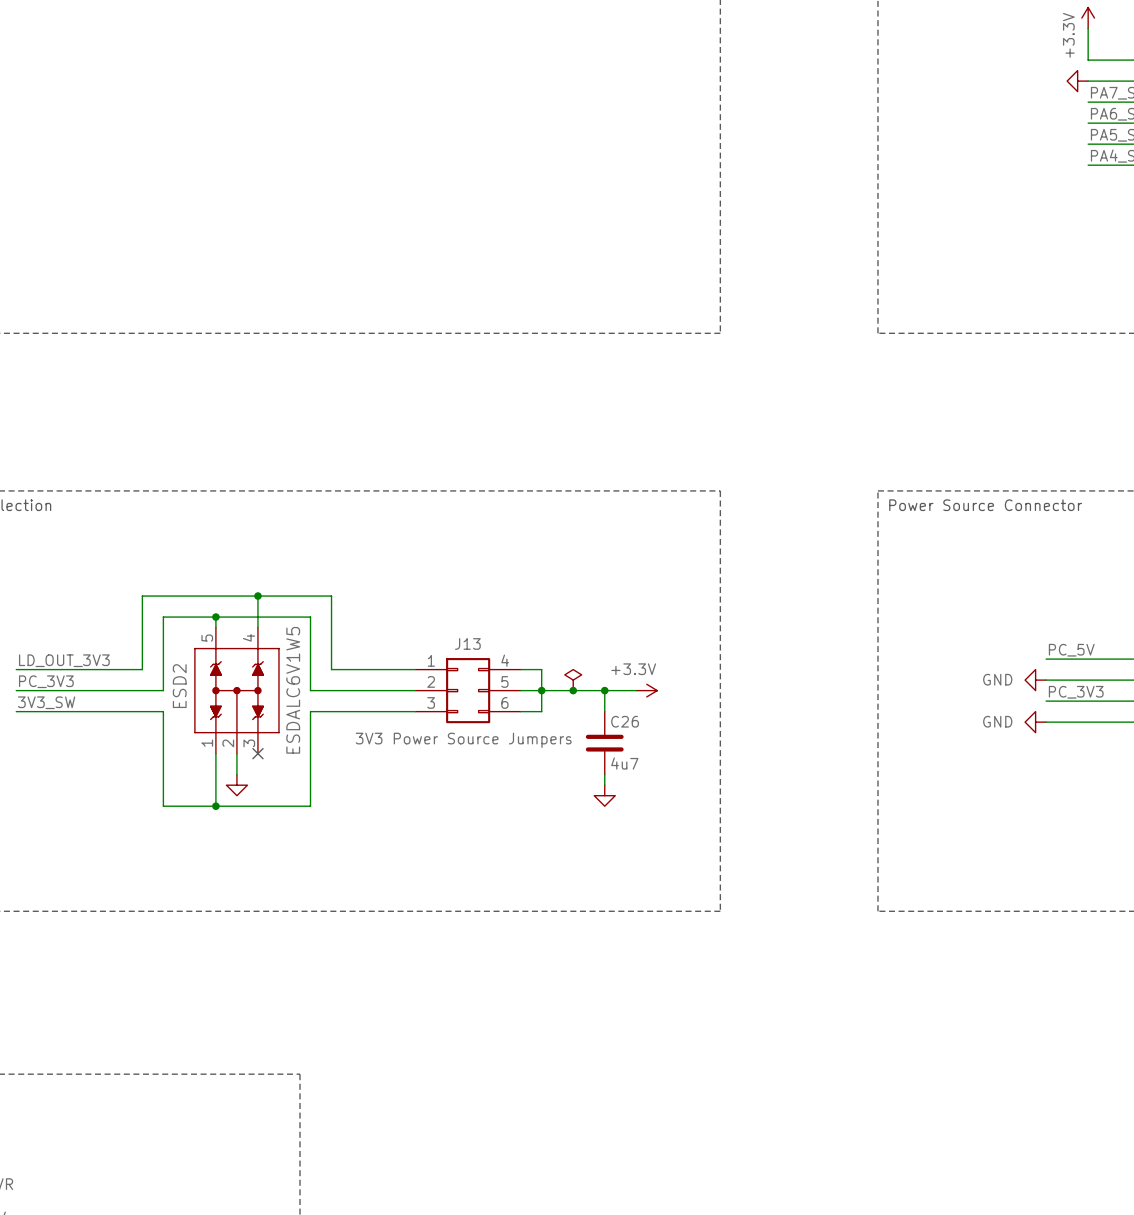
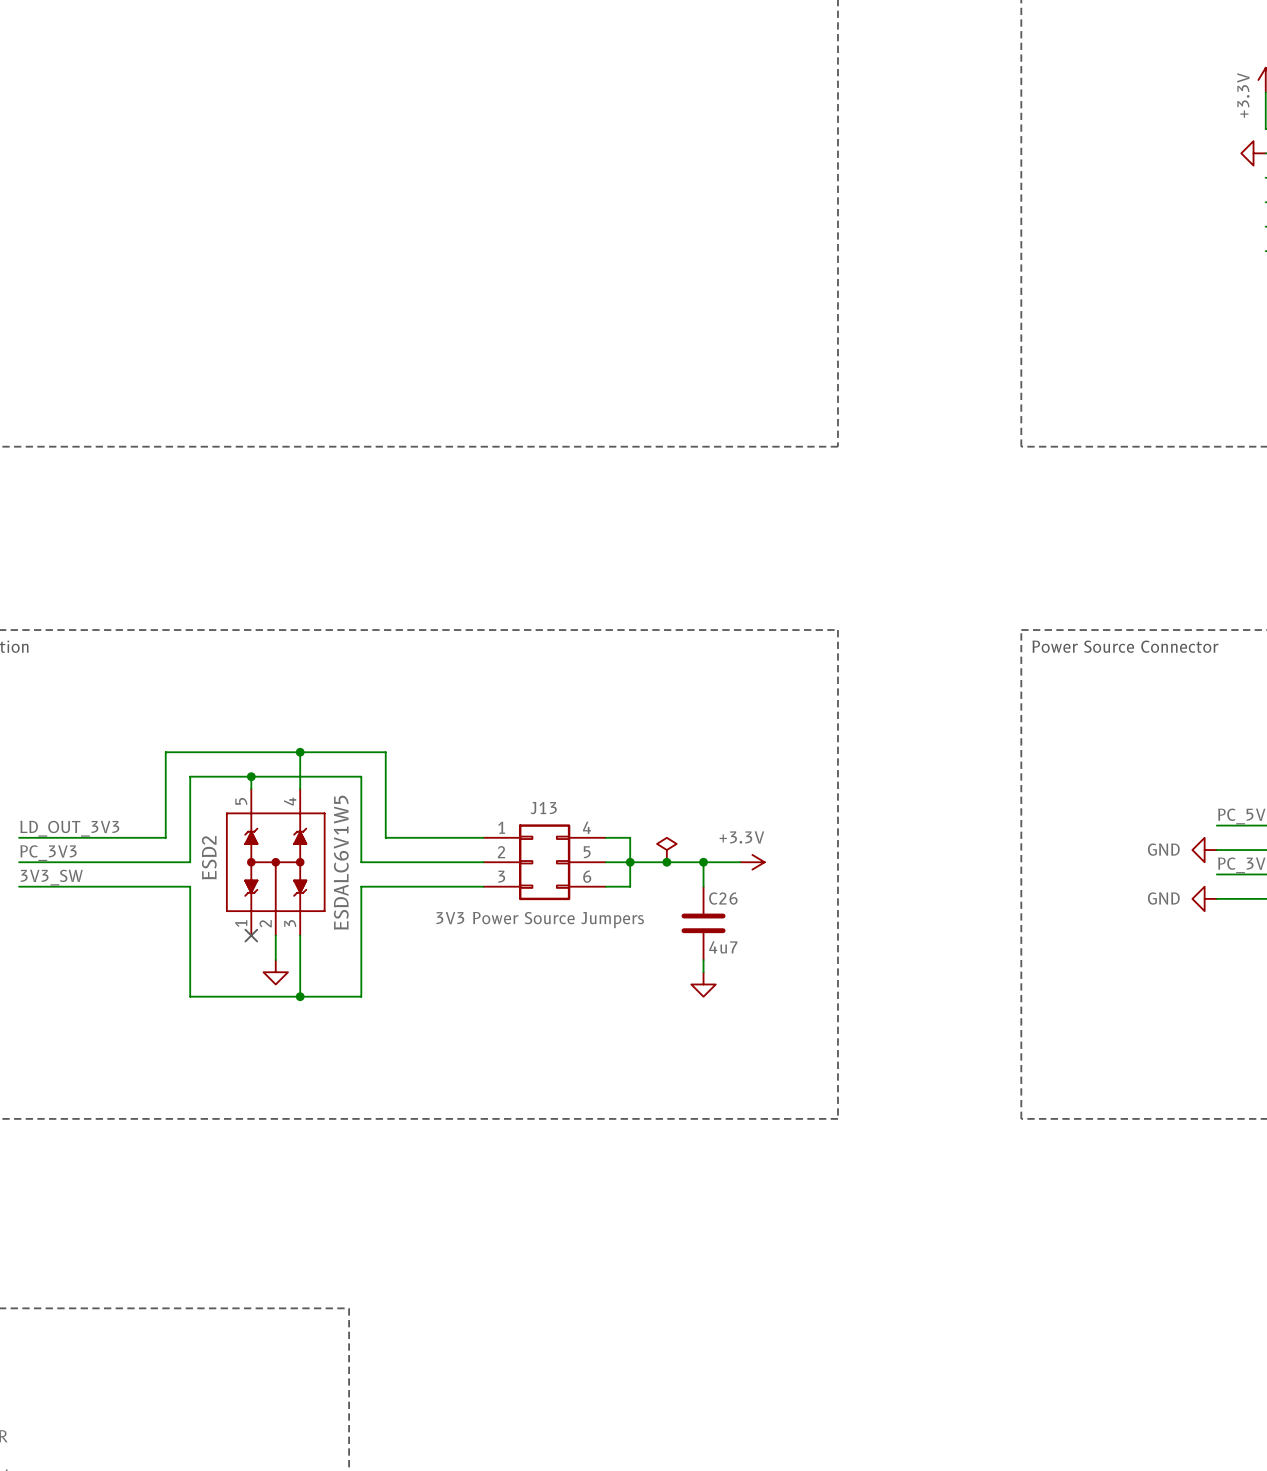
wire: (215, 753) (215, 806) -> (300, 935) (300, 996)
no-connect mark position: (257, 753) -> (251, 935)
junction position: (215, 806) -> (300, 996)

